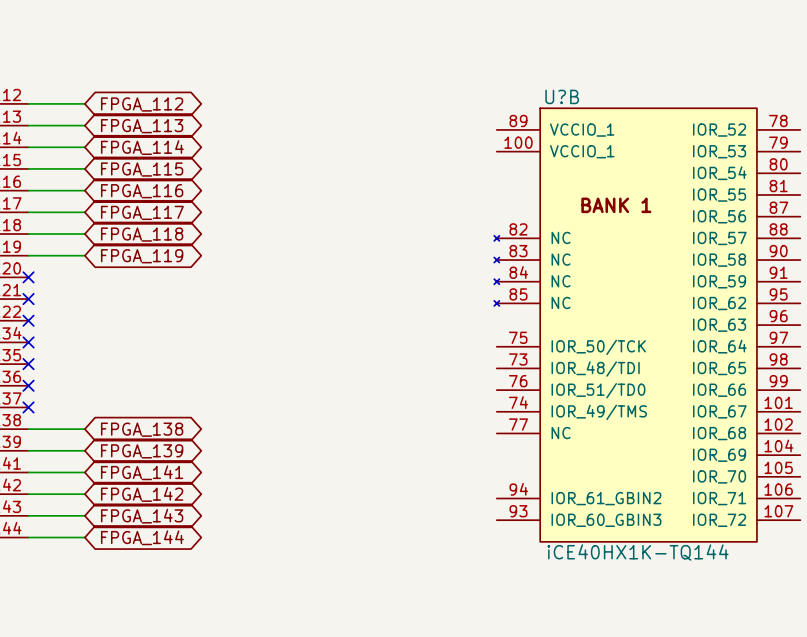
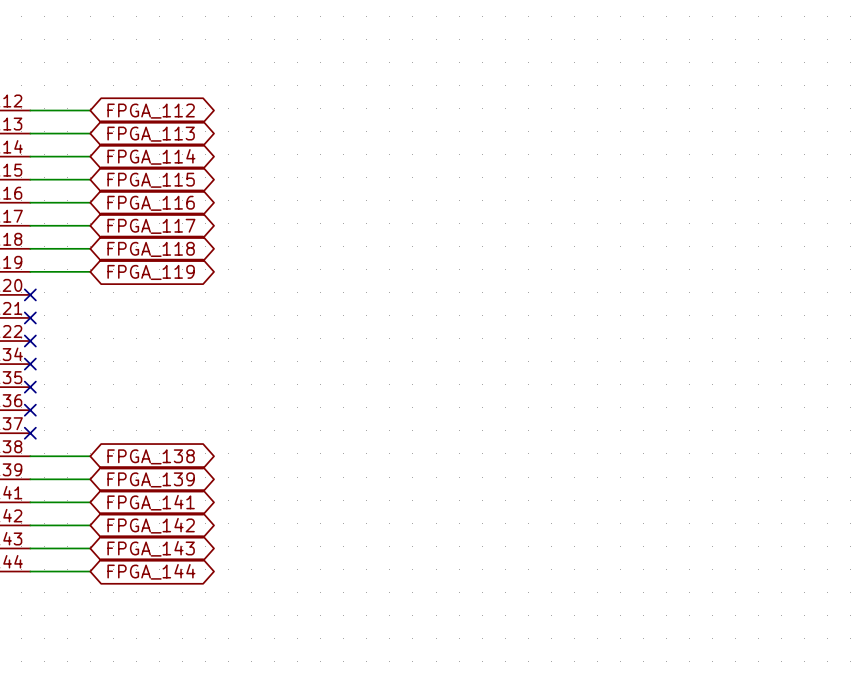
U?B: iCE40HX1K-TQ144 (647, 325) -> none

